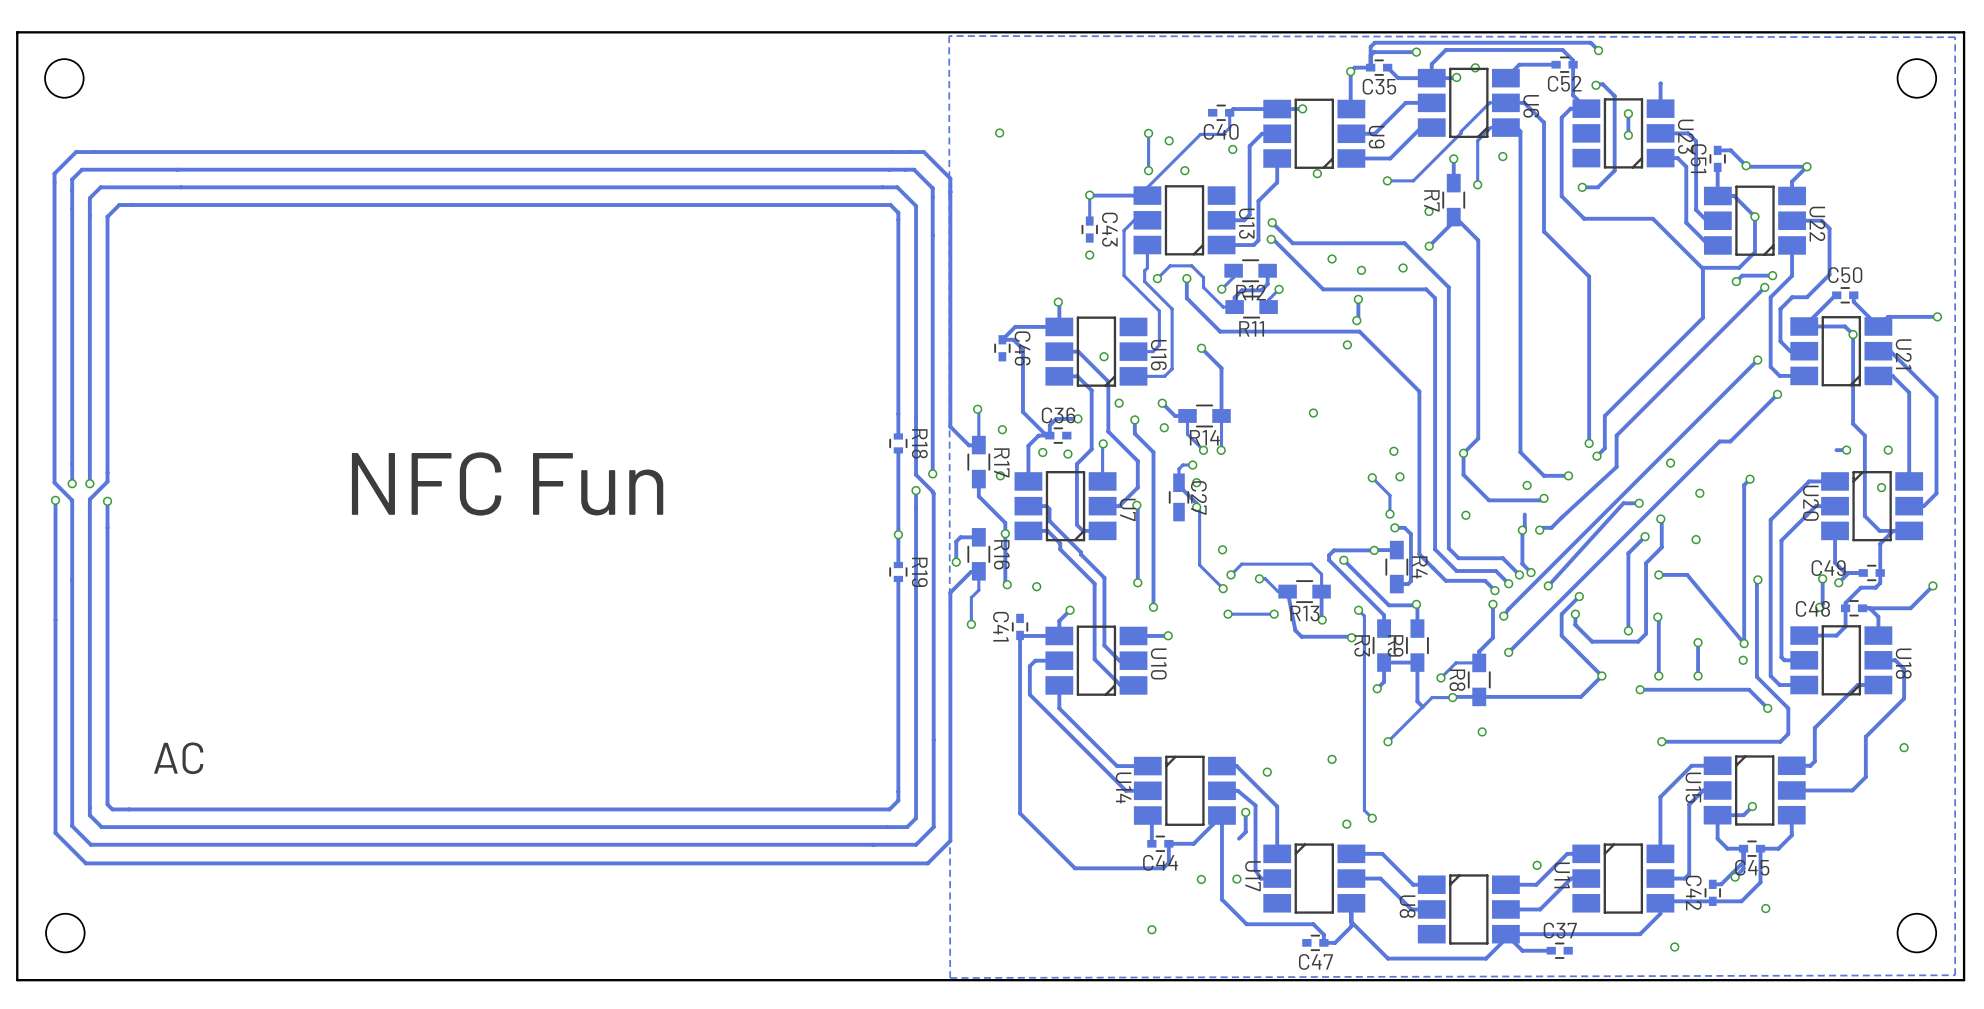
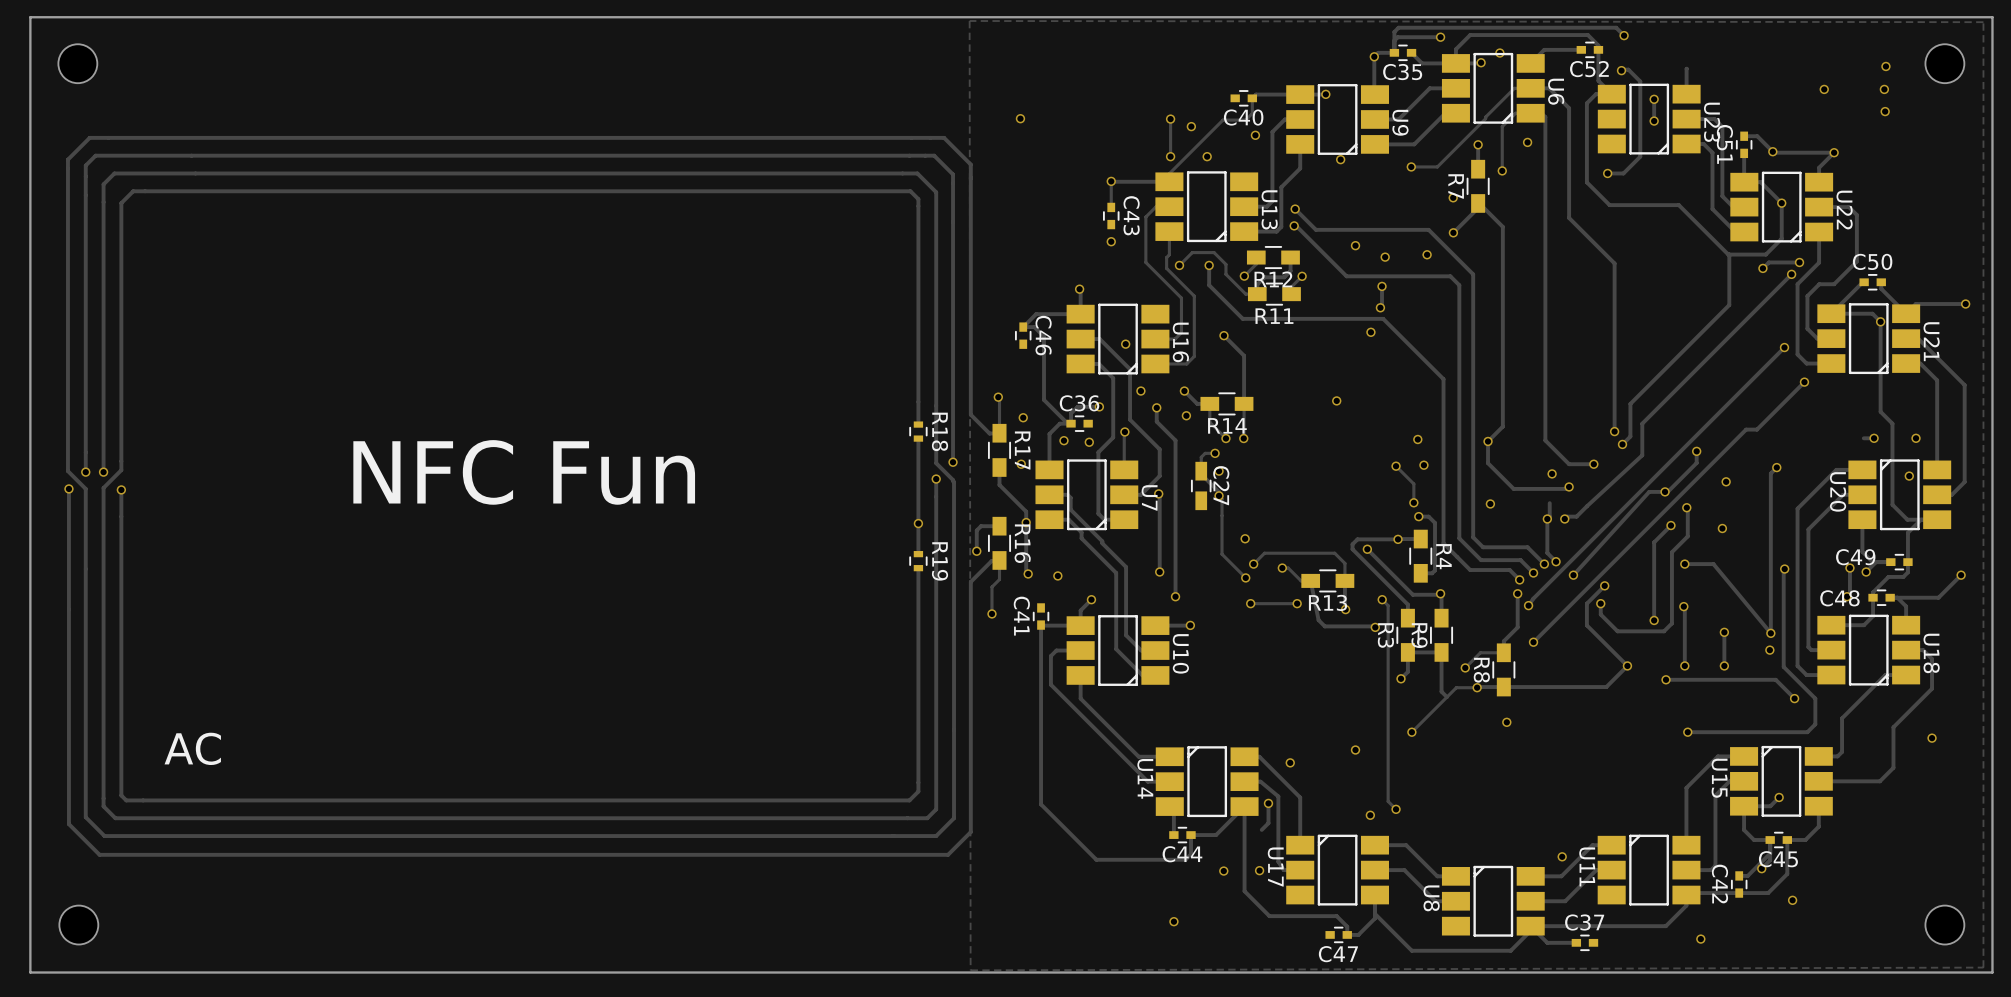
via: none -> (1885, 66)
via: none -> (1824, 89)
via: none -> (1884, 89)
via: none -> (1885, 111)
track: none -> (1696, 451) (1696, 463) (1667, 491) (1665, 491)

